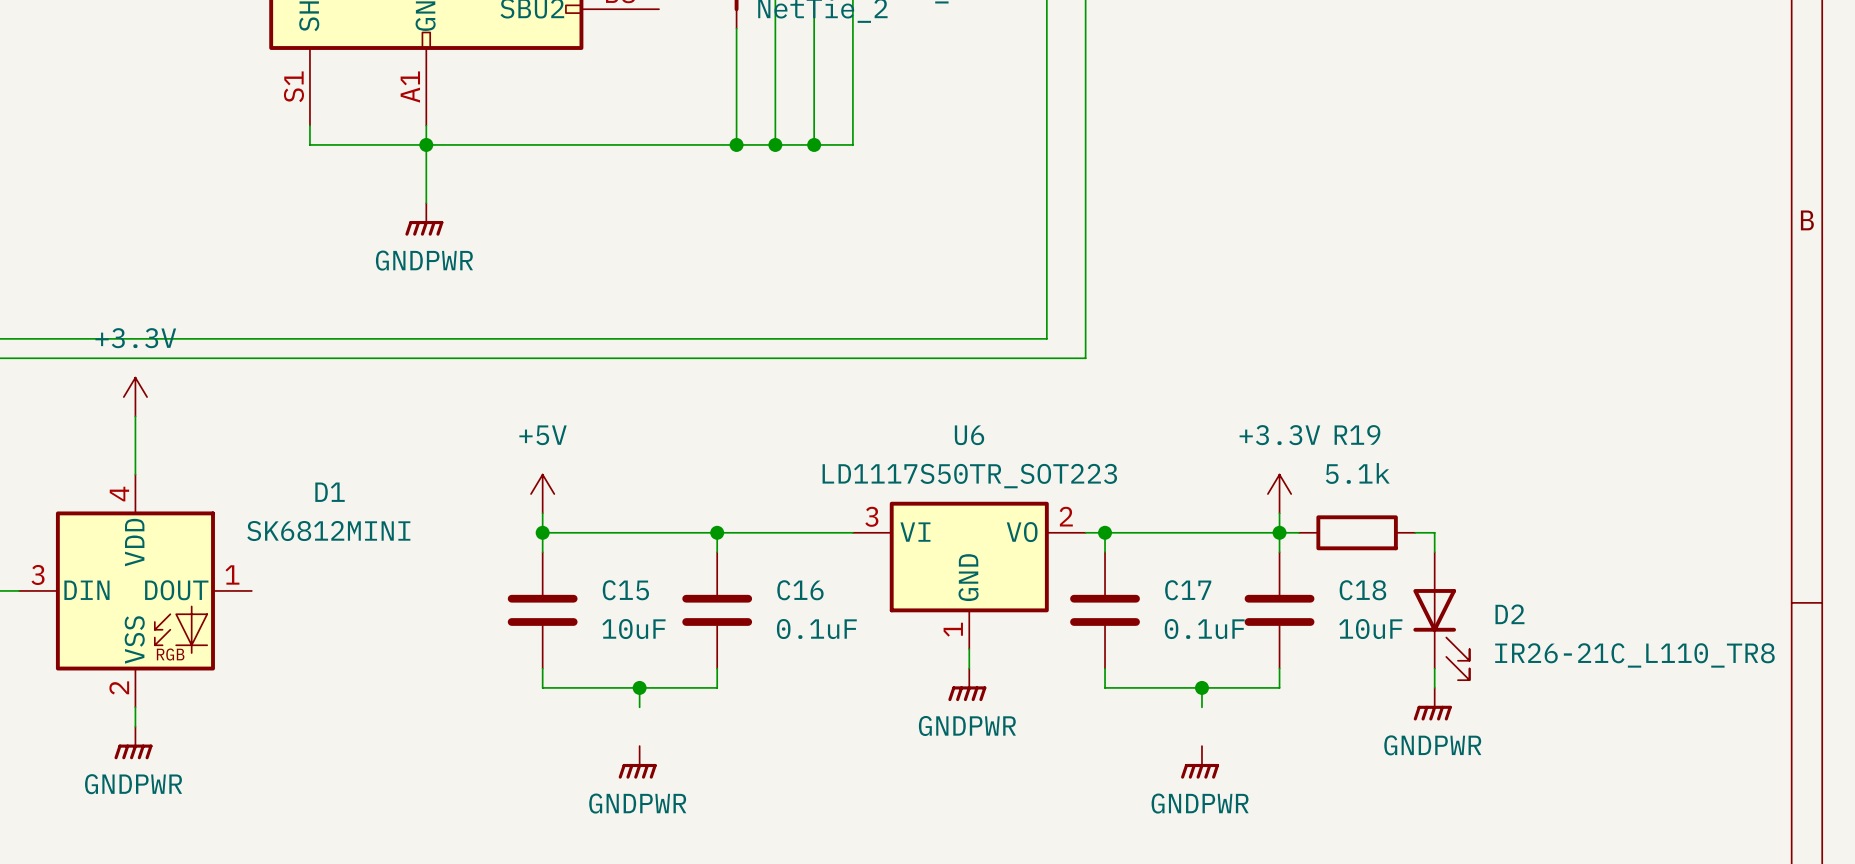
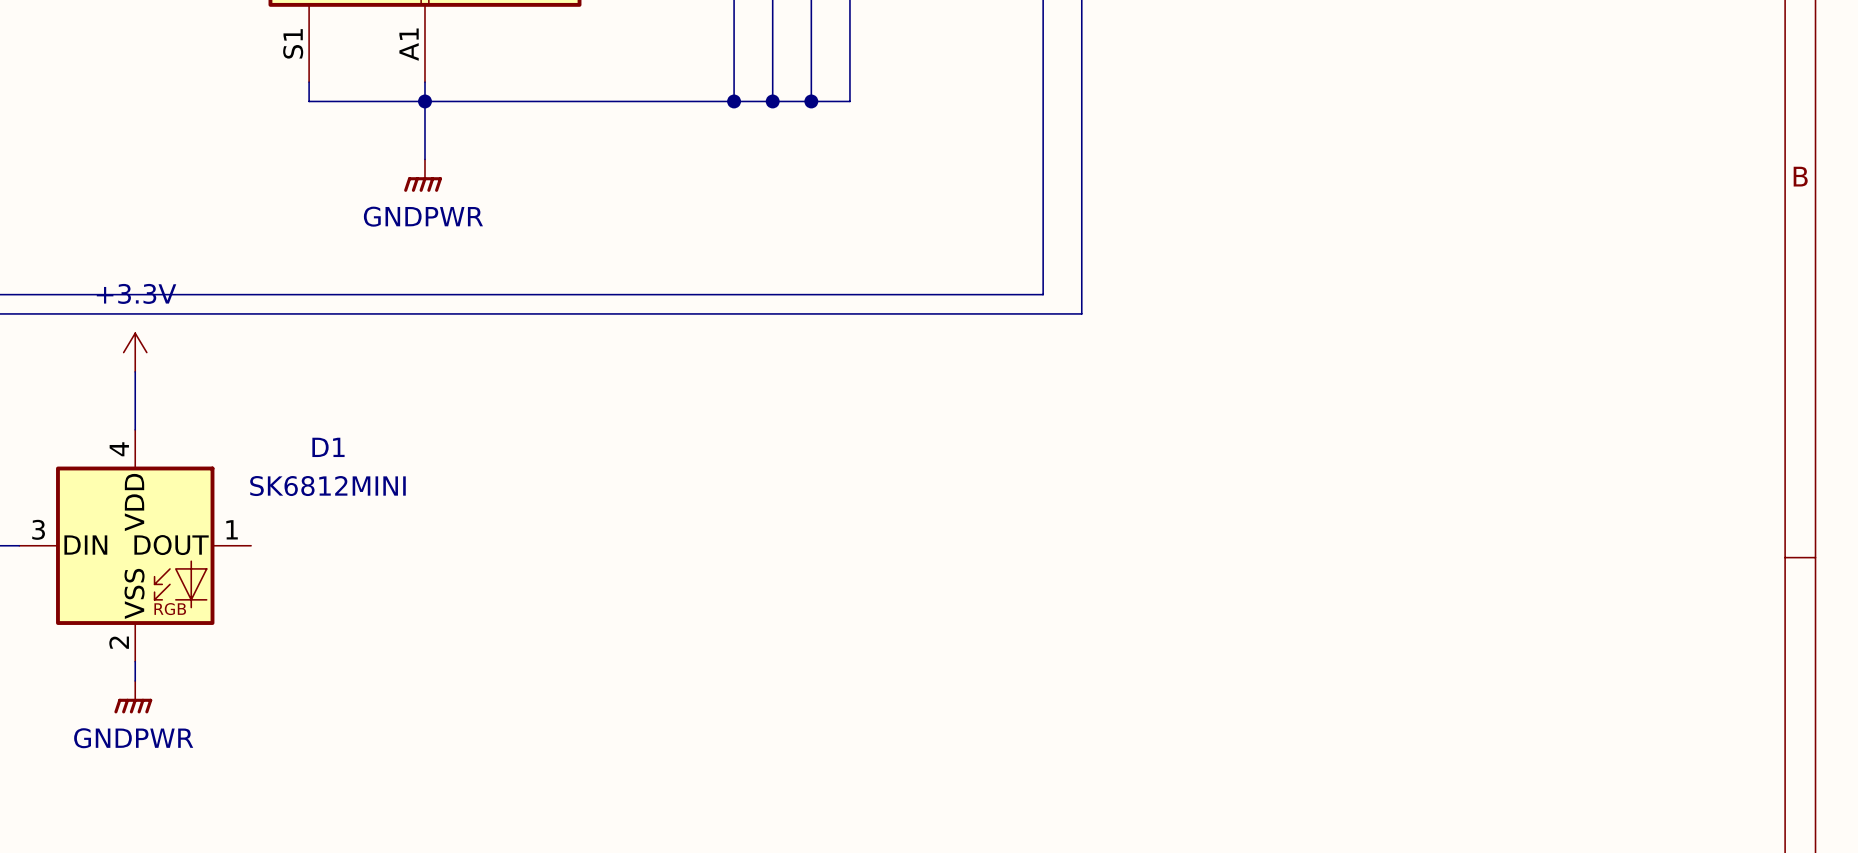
power symbol: +5V (542, 494) -> none
power symbol: +3.3V (1279, 494) -> none
wire: (542, 513) (542, 552) -> none
wire: (1279, 513) (1279, 552) -> none
wire: (542, 532) (852, 532) -> none
junction: (542, 532) -> none
wire: (717, 532) (717, 552) -> none
junction: (717, 532) -> none
wire: (1085, 532) (1298, 532) -> none
wire: (1105, 532) (1105, 552) -> none
junction: (1105, 532) -> none
junction: (1279, 532) -> none
R19: 5.1k (1357, 532) -> none
wire: (1415, 532) (1434, 532) (1434, 552) -> none
U6: LD1117S50TR_SOT223 (969, 575) -> none
C15: 10uF (542, 610) -> none
C16: 0.1uF (717, 610) -> none
C17: 0.1uF (1105, 610) -> none
C18: 10uF (1279, 610) -> none
D2: IR26-21C_L110_TR8 (1441, 616) -> none
wire: (969, 649) (969, 668) -> none
wire: (542, 668) (542, 687) (717, 687) (717, 668) -> none
wire: (1105, 668) (1105, 687) (1279, 687) (1279, 668) -> none
wire: (1434, 668) (1434, 687) -> none
power symbol: GNDPWR (967, 684) -> none
wire: (639, 687) (639, 707) -> none
junction: (639, 687) -> none
wire: (1201, 687) (1201, 707) -> none
junction: (1201, 687) -> none
power symbol: GNDPWR (1432, 704) -> none
power symbol: GNDPWR (637, 762) -> none
power symbol: GNDPWR (1200, 762) -> none

